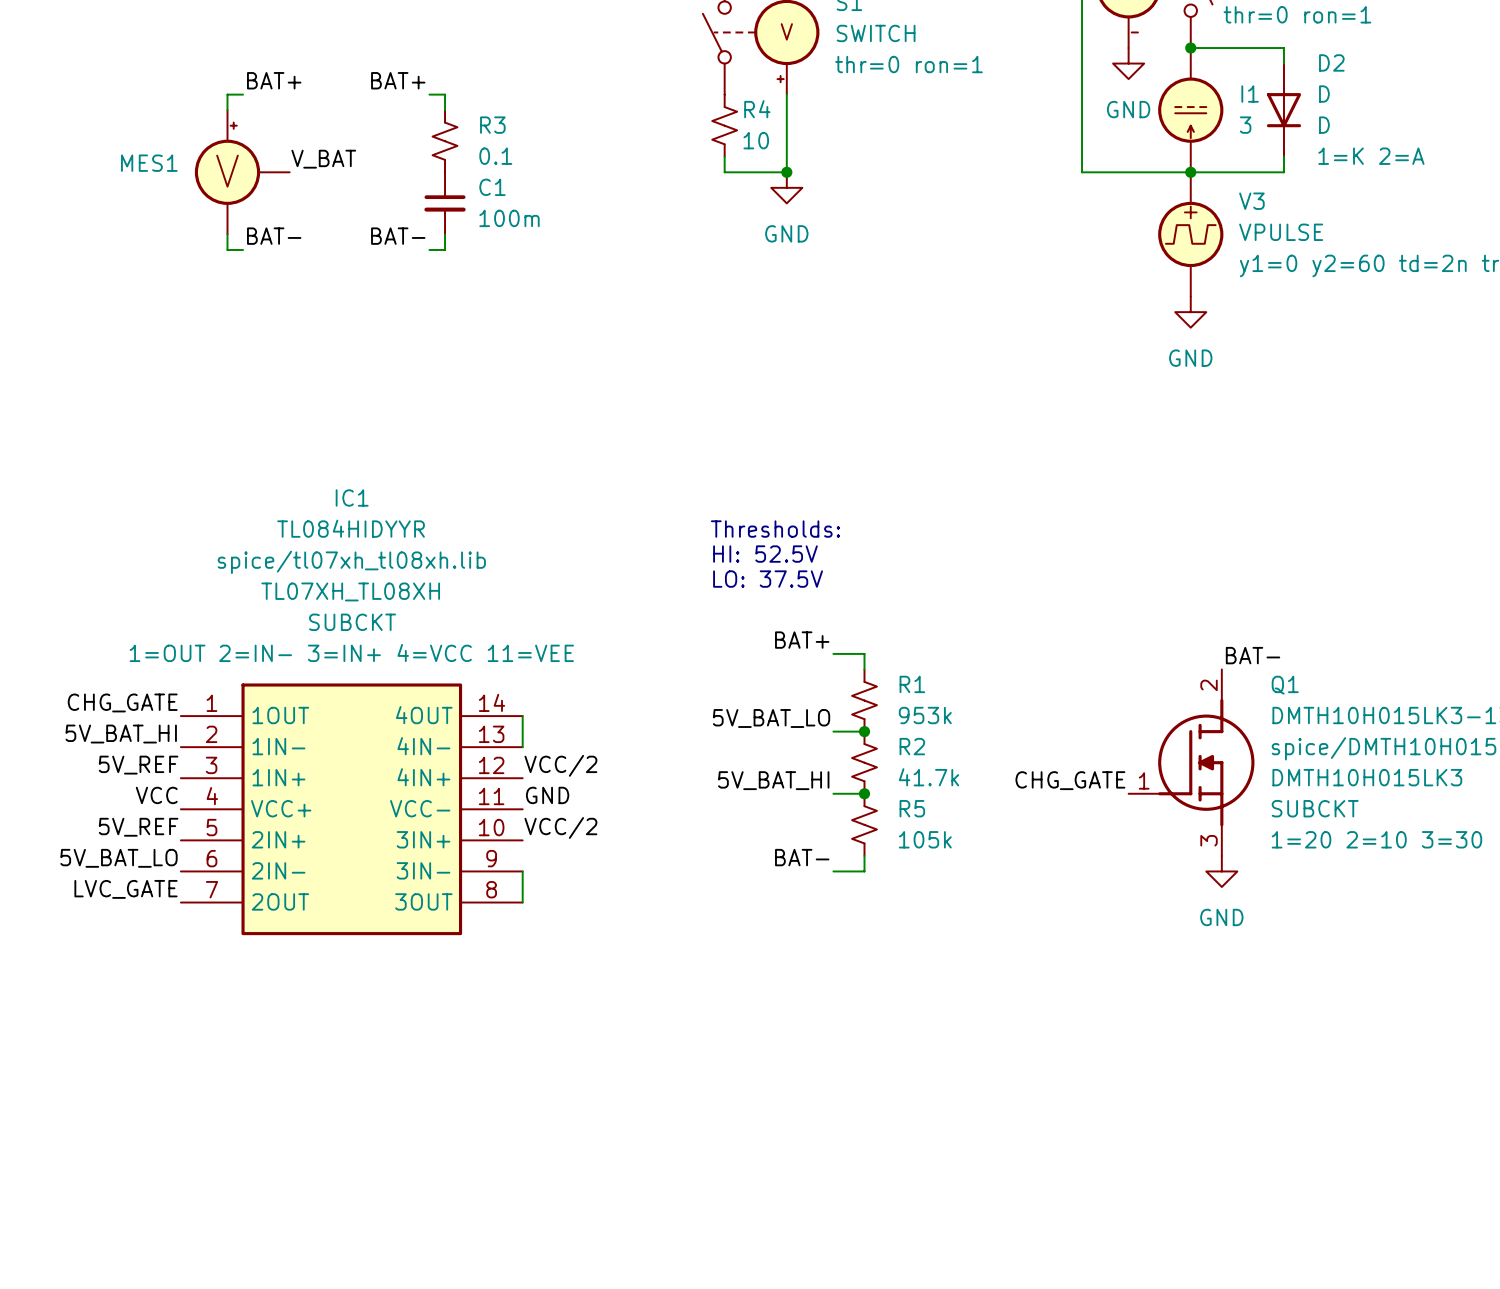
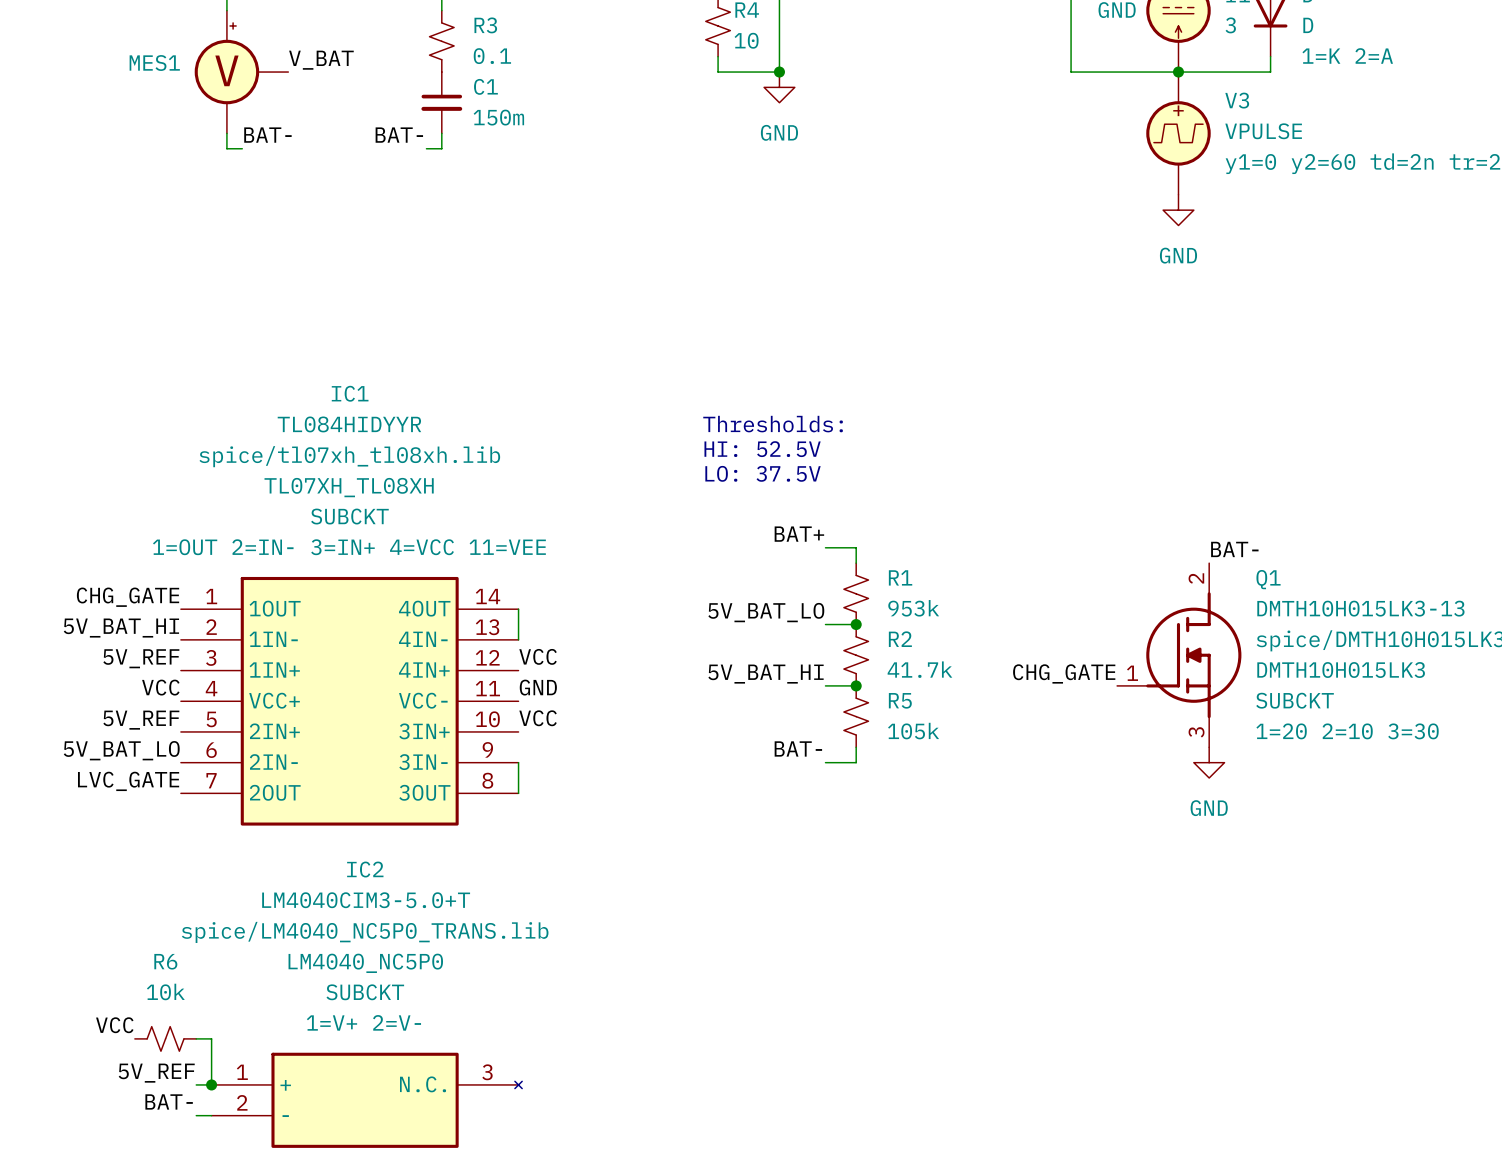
C1 value: 100m (509, 218) -> 150m (498, 117)
label: VCC/2 (560, 765) -> VCC (538, 656)
label: VCC/2 (560, 827) -> VCC (538, 718)
label: none -> VCC (114, 1025)
R6: none -> 10k (165, 1038)
wire: none -> (196, 1038) (211, 1038) (211, 1084) (196, 1084)
label: none -> 5V_REF (156, 1073)
junction: none -> (211, 1084)
IC2: none -> LM4040CIM3-5.0+T (366, 1100)
label: none -> BAT- (169, 1101)
wire: none -> (196, 1115) (211, 1115)

